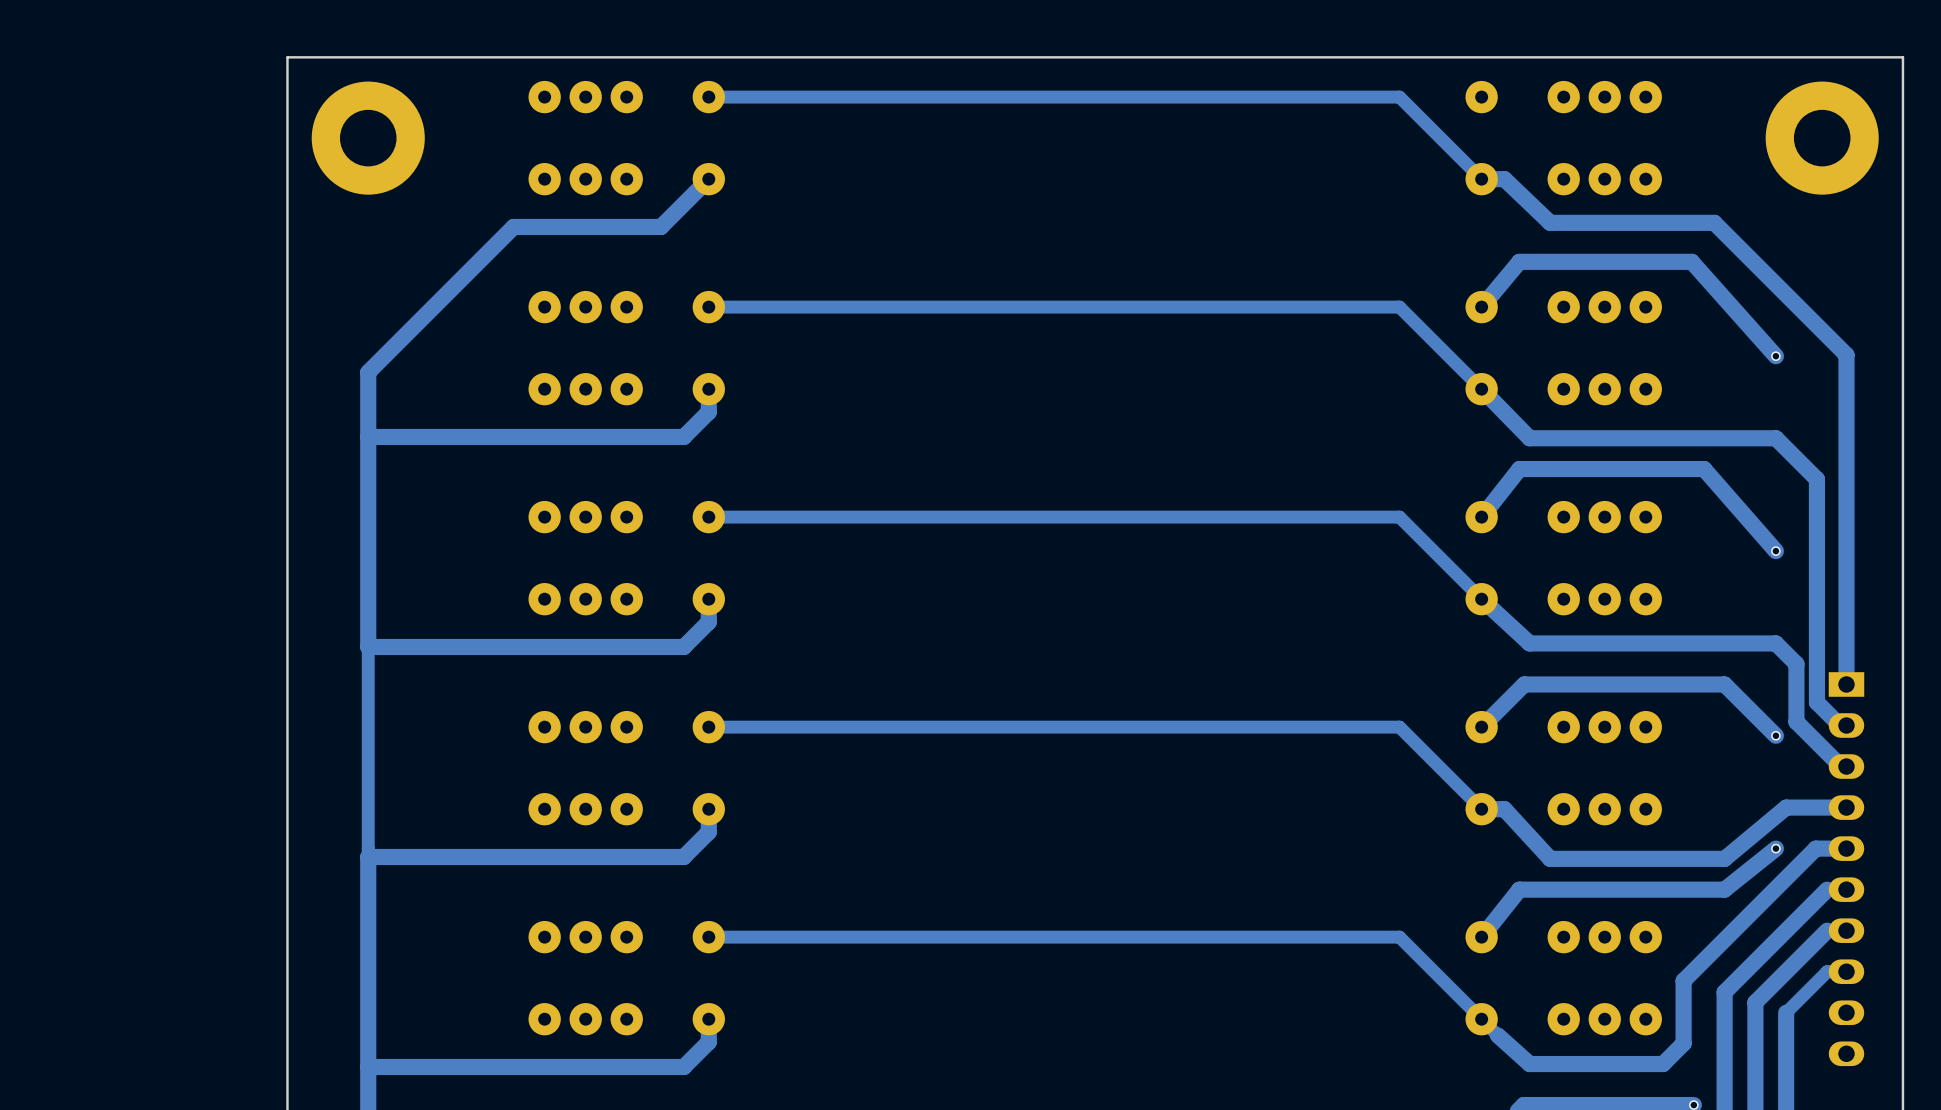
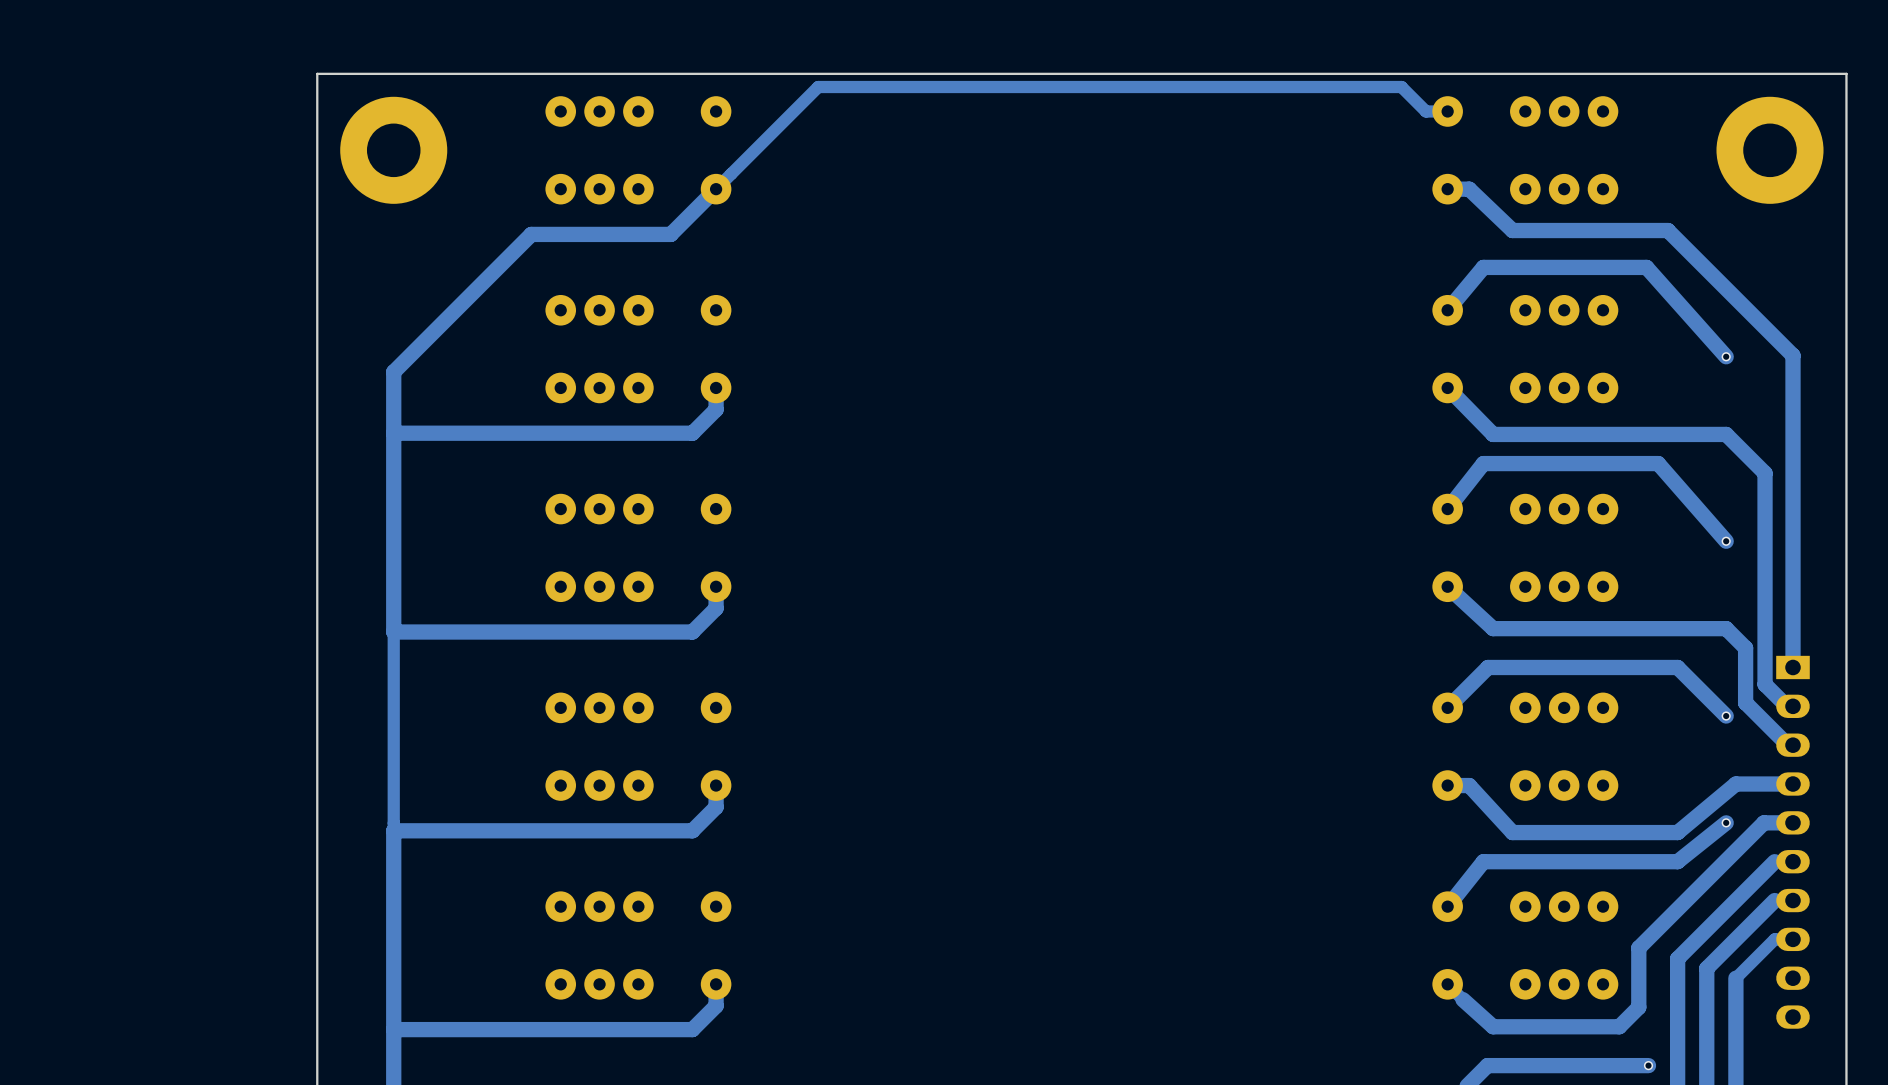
track: (708, 97) (1399, 97) (1481, 179) -> none
track: none -> (1447, 111) (1426, 111) (1401, 87) (818, 87) (716, 189)
track: (708, 307) (1399, 307) (1481, 389) -> none
track: (708, 517) (1399, 517) (1481, 599) -> none
track: (708, 727) (1399, 727) (1481, 809) -> none
track: (708, 937) (1399, 937) (1481, 1019) -> none

